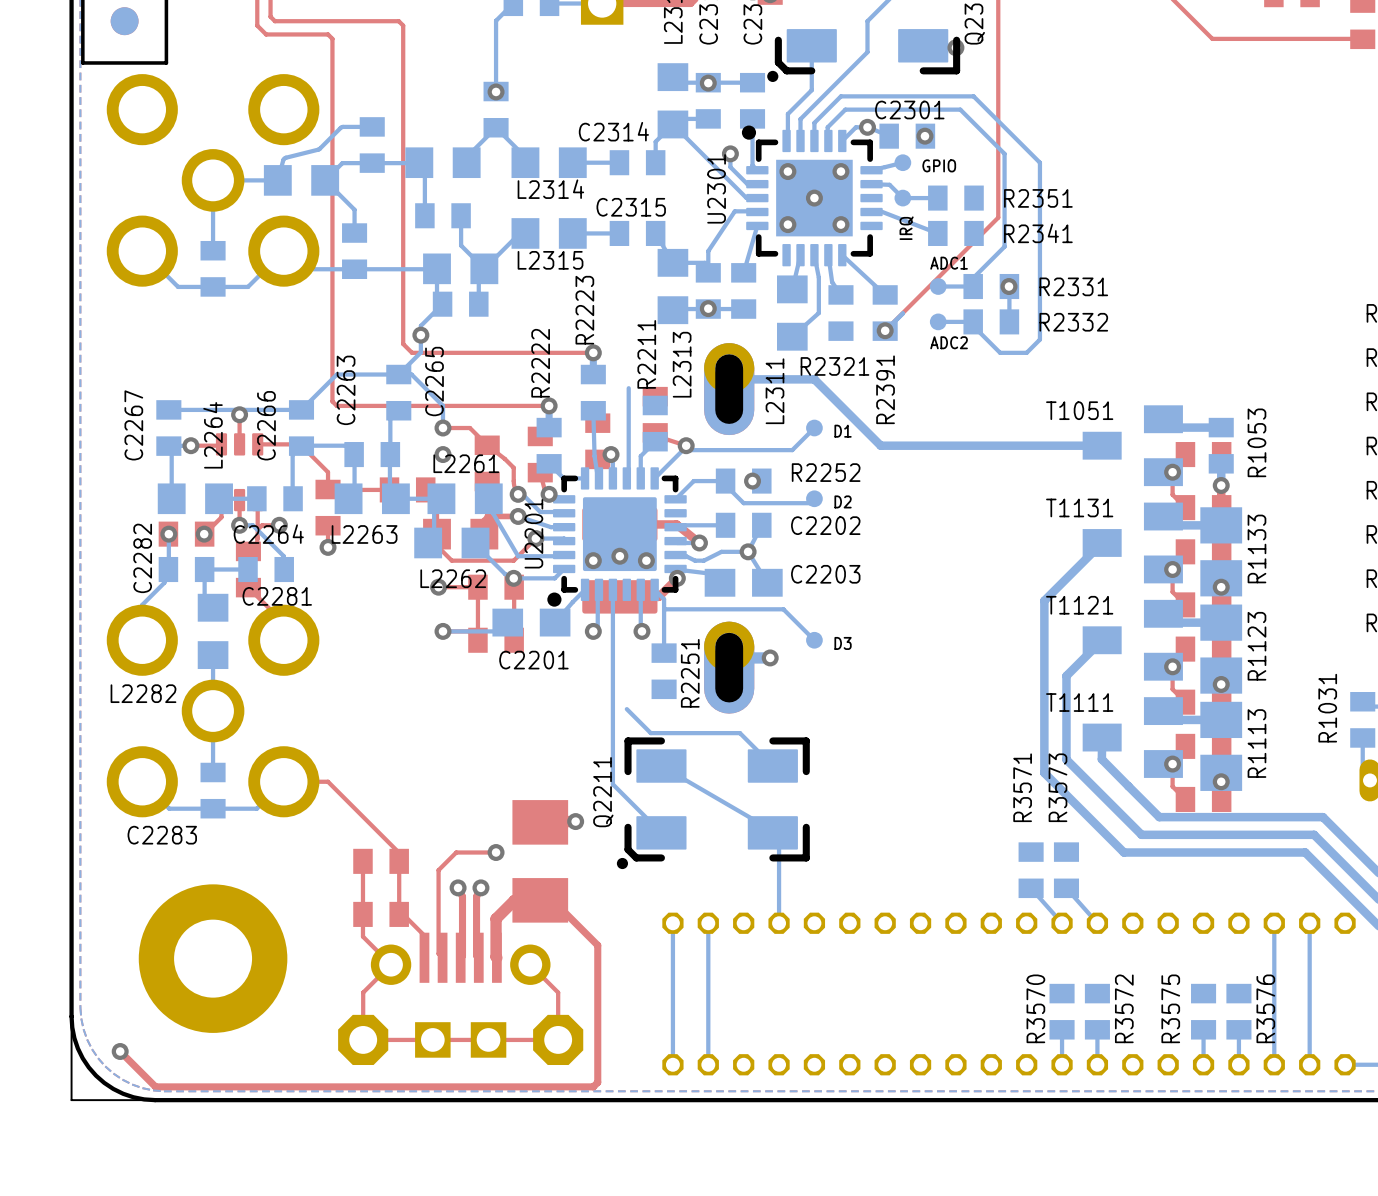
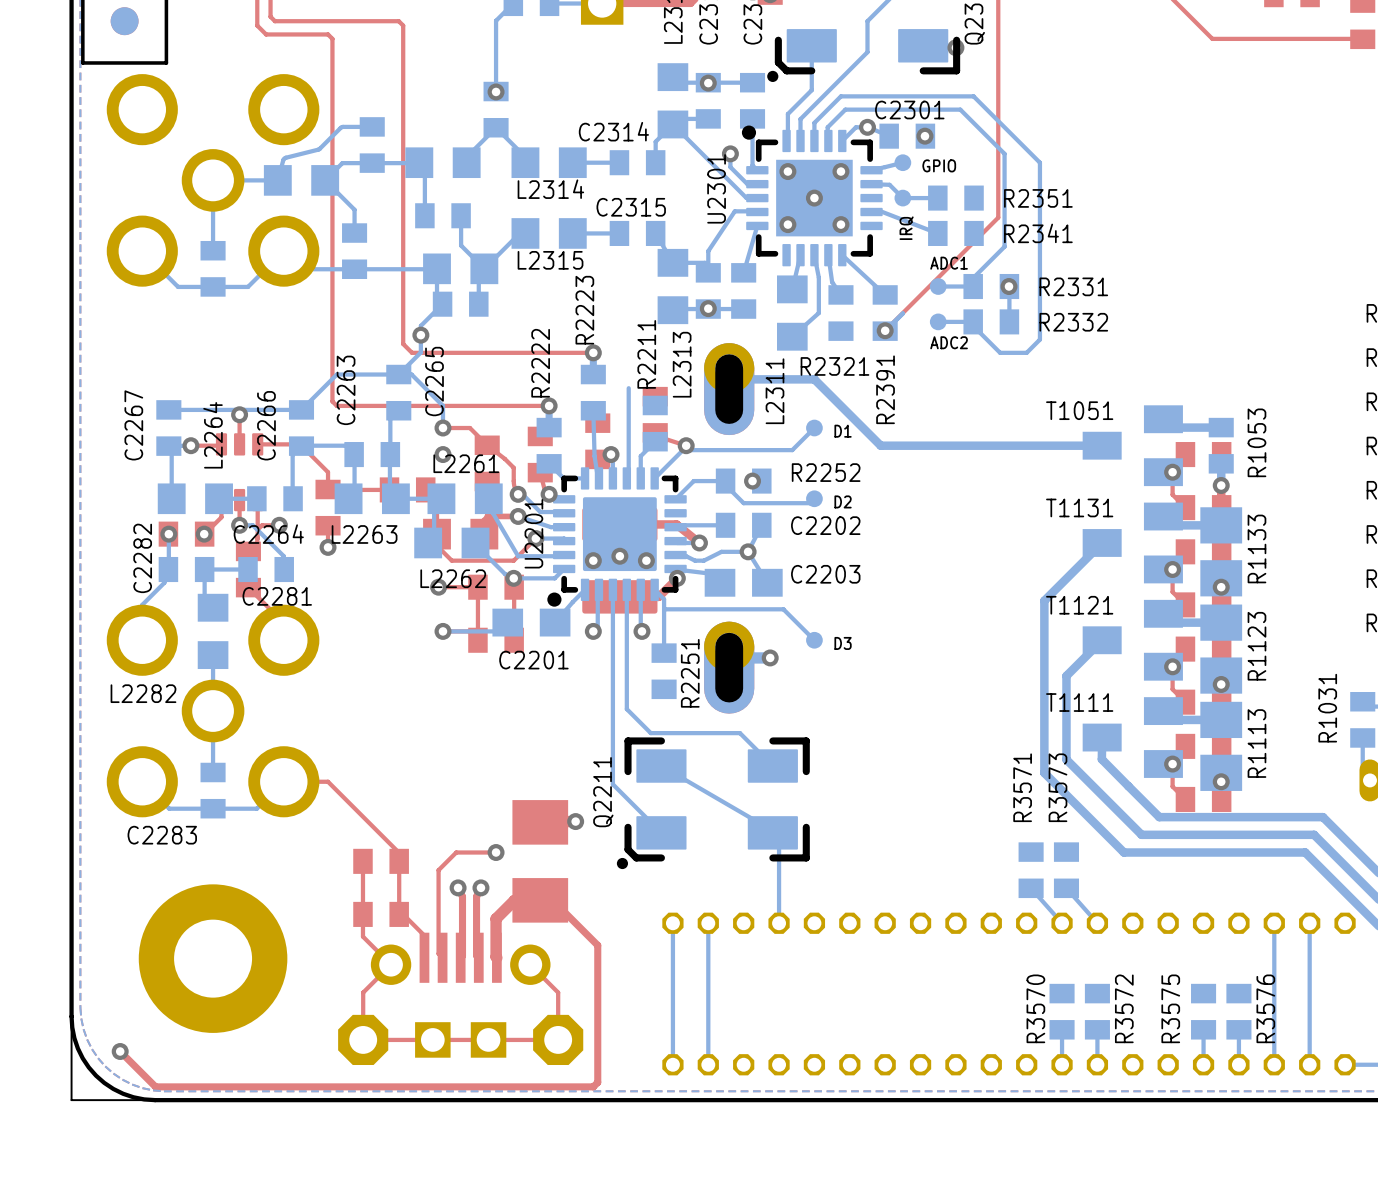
bottom track: none -> (626, 589) (626, 709)

